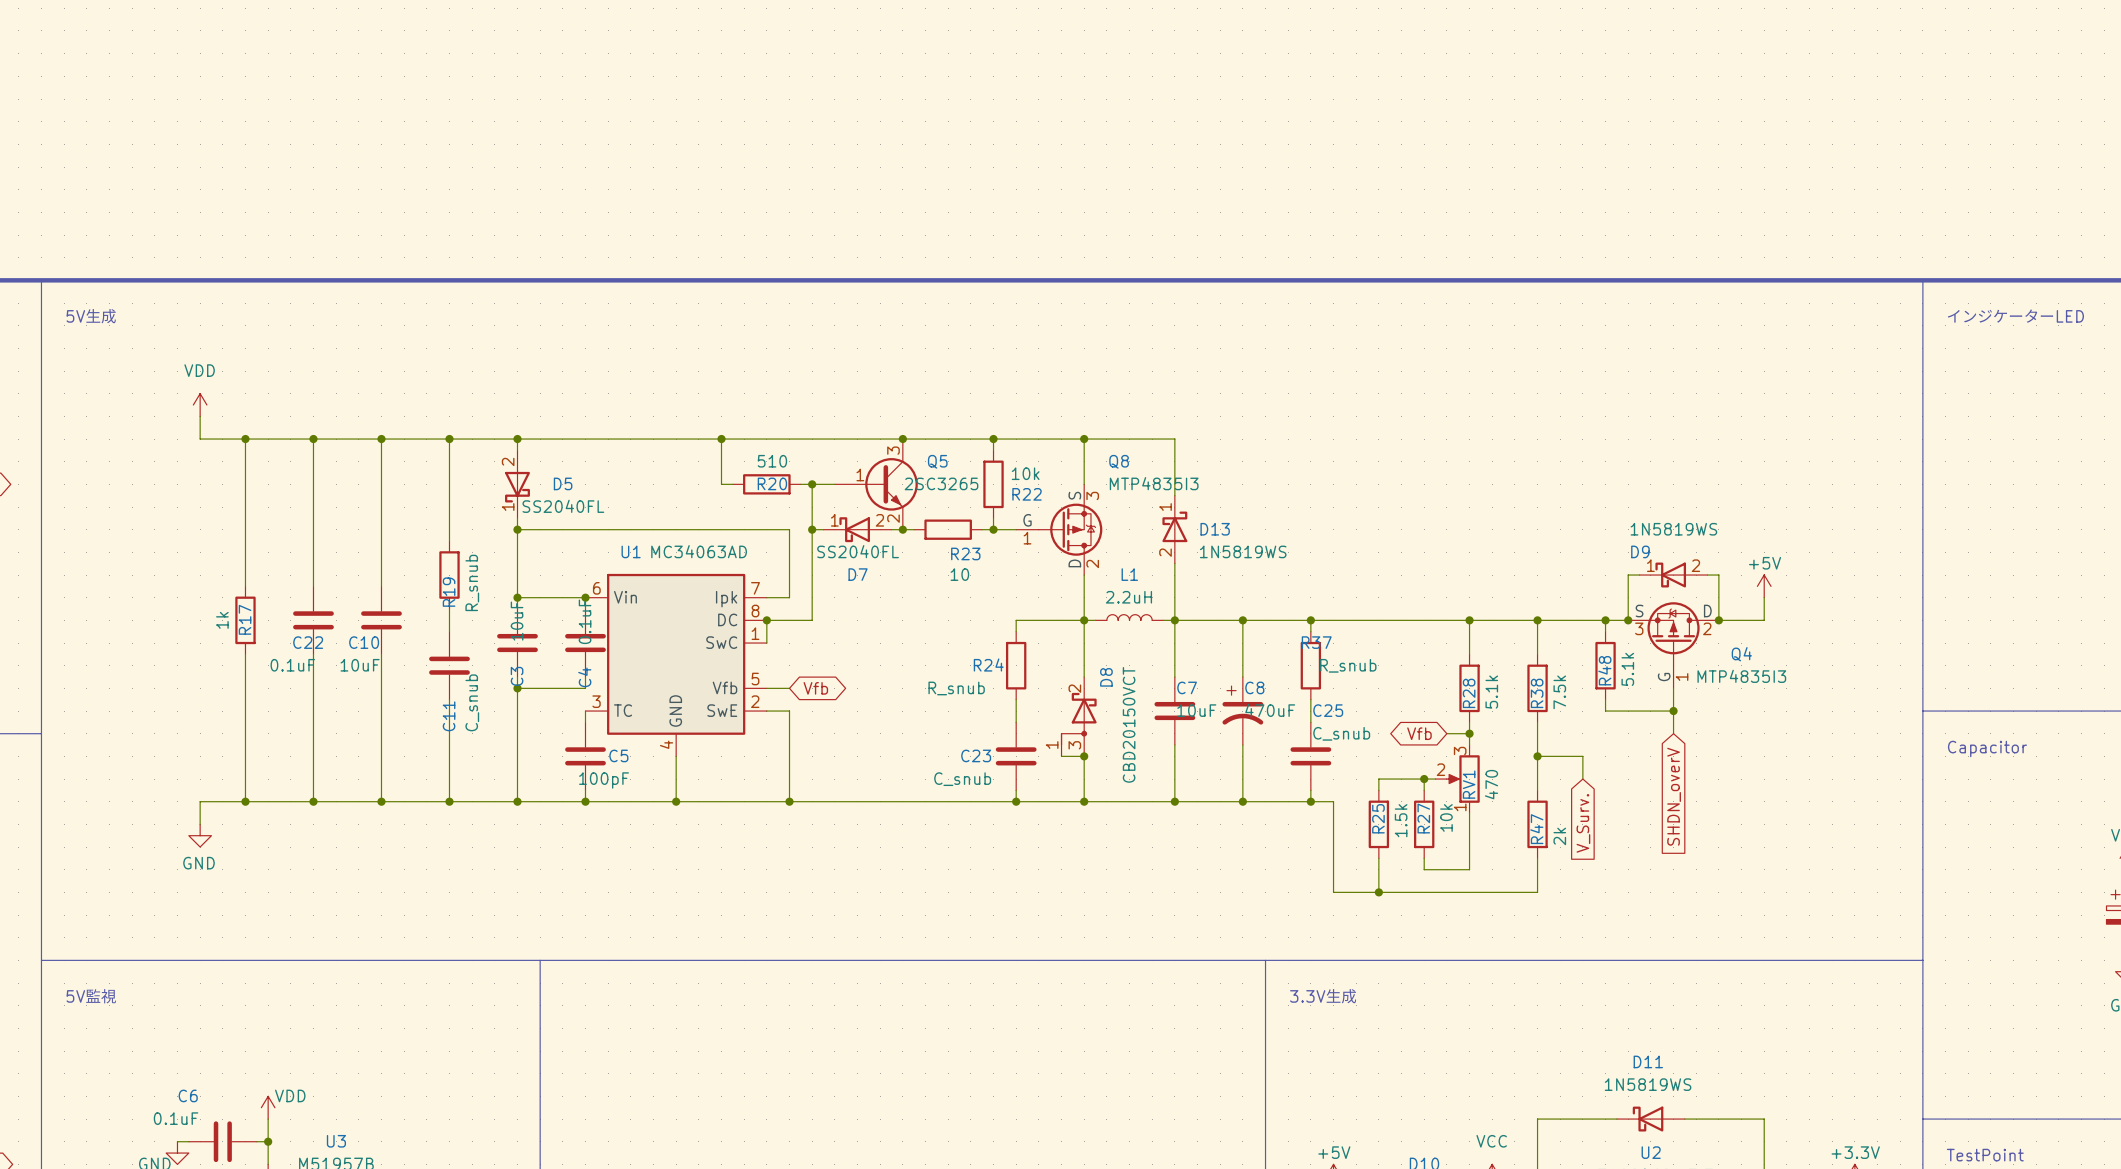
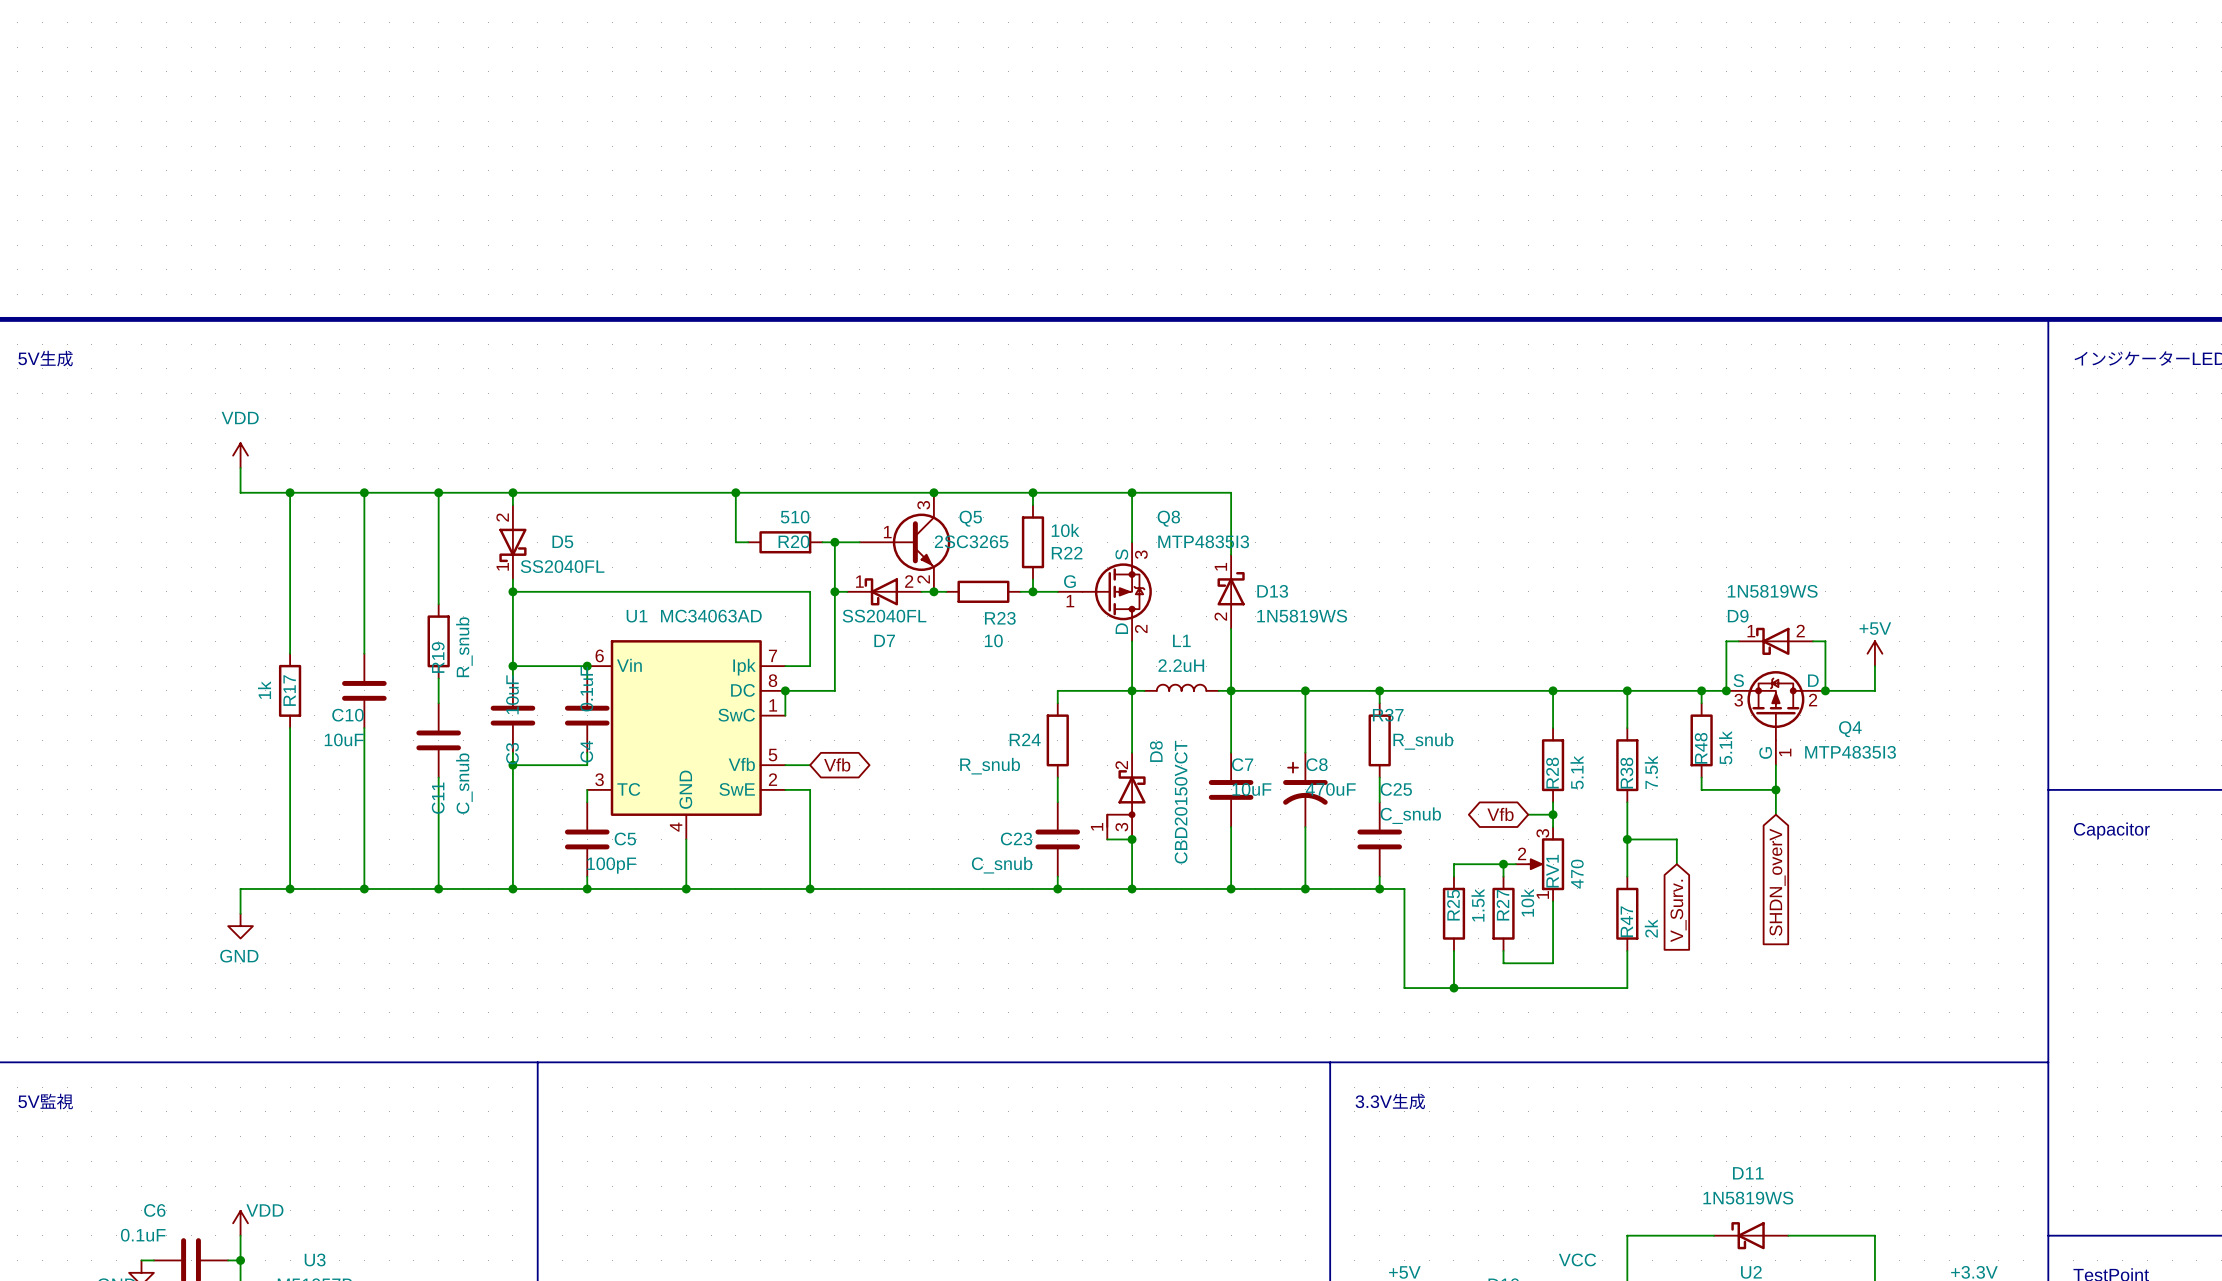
power symbol position: VDD (200, 405) -> VDD (240, 455)
wire: (200, 416) (200, 439) (268, 439) -> (240, 468) (240, 492)
wire: (245, 439) (245, 586) -> none
junction: (245, 439) -> none
R17 position: (245, 620) -> (290, 690)
C22: 0.1uF (313, 620) -> none
wire: (245, 654) (245, 801) -> none
junction: (245, 801) -> none
wire: (268, 801) (200, 801) (200, 824) -> (240, 888) (240, 913)
power symbol position: GND (200, 835) -> GND (240, 926)

